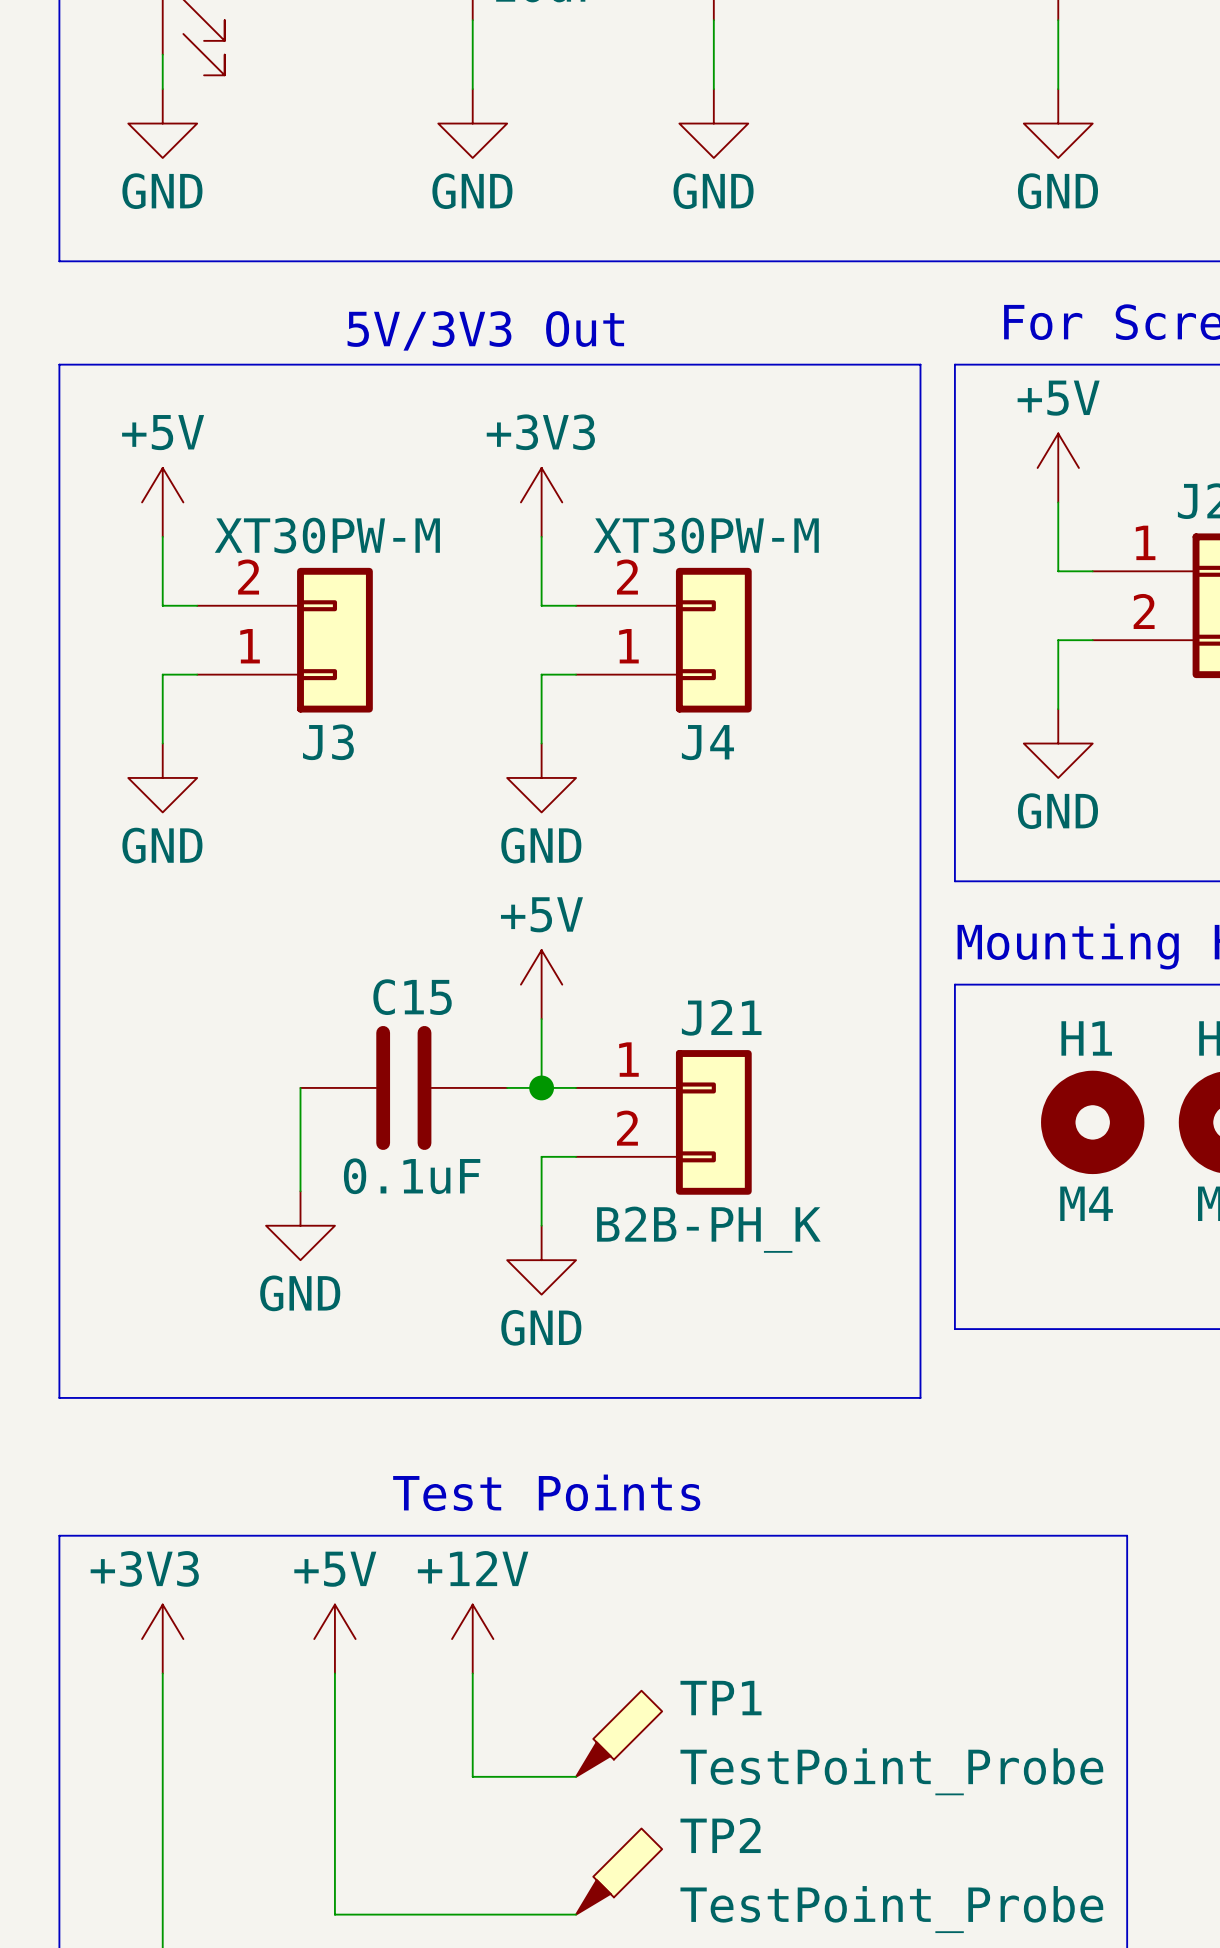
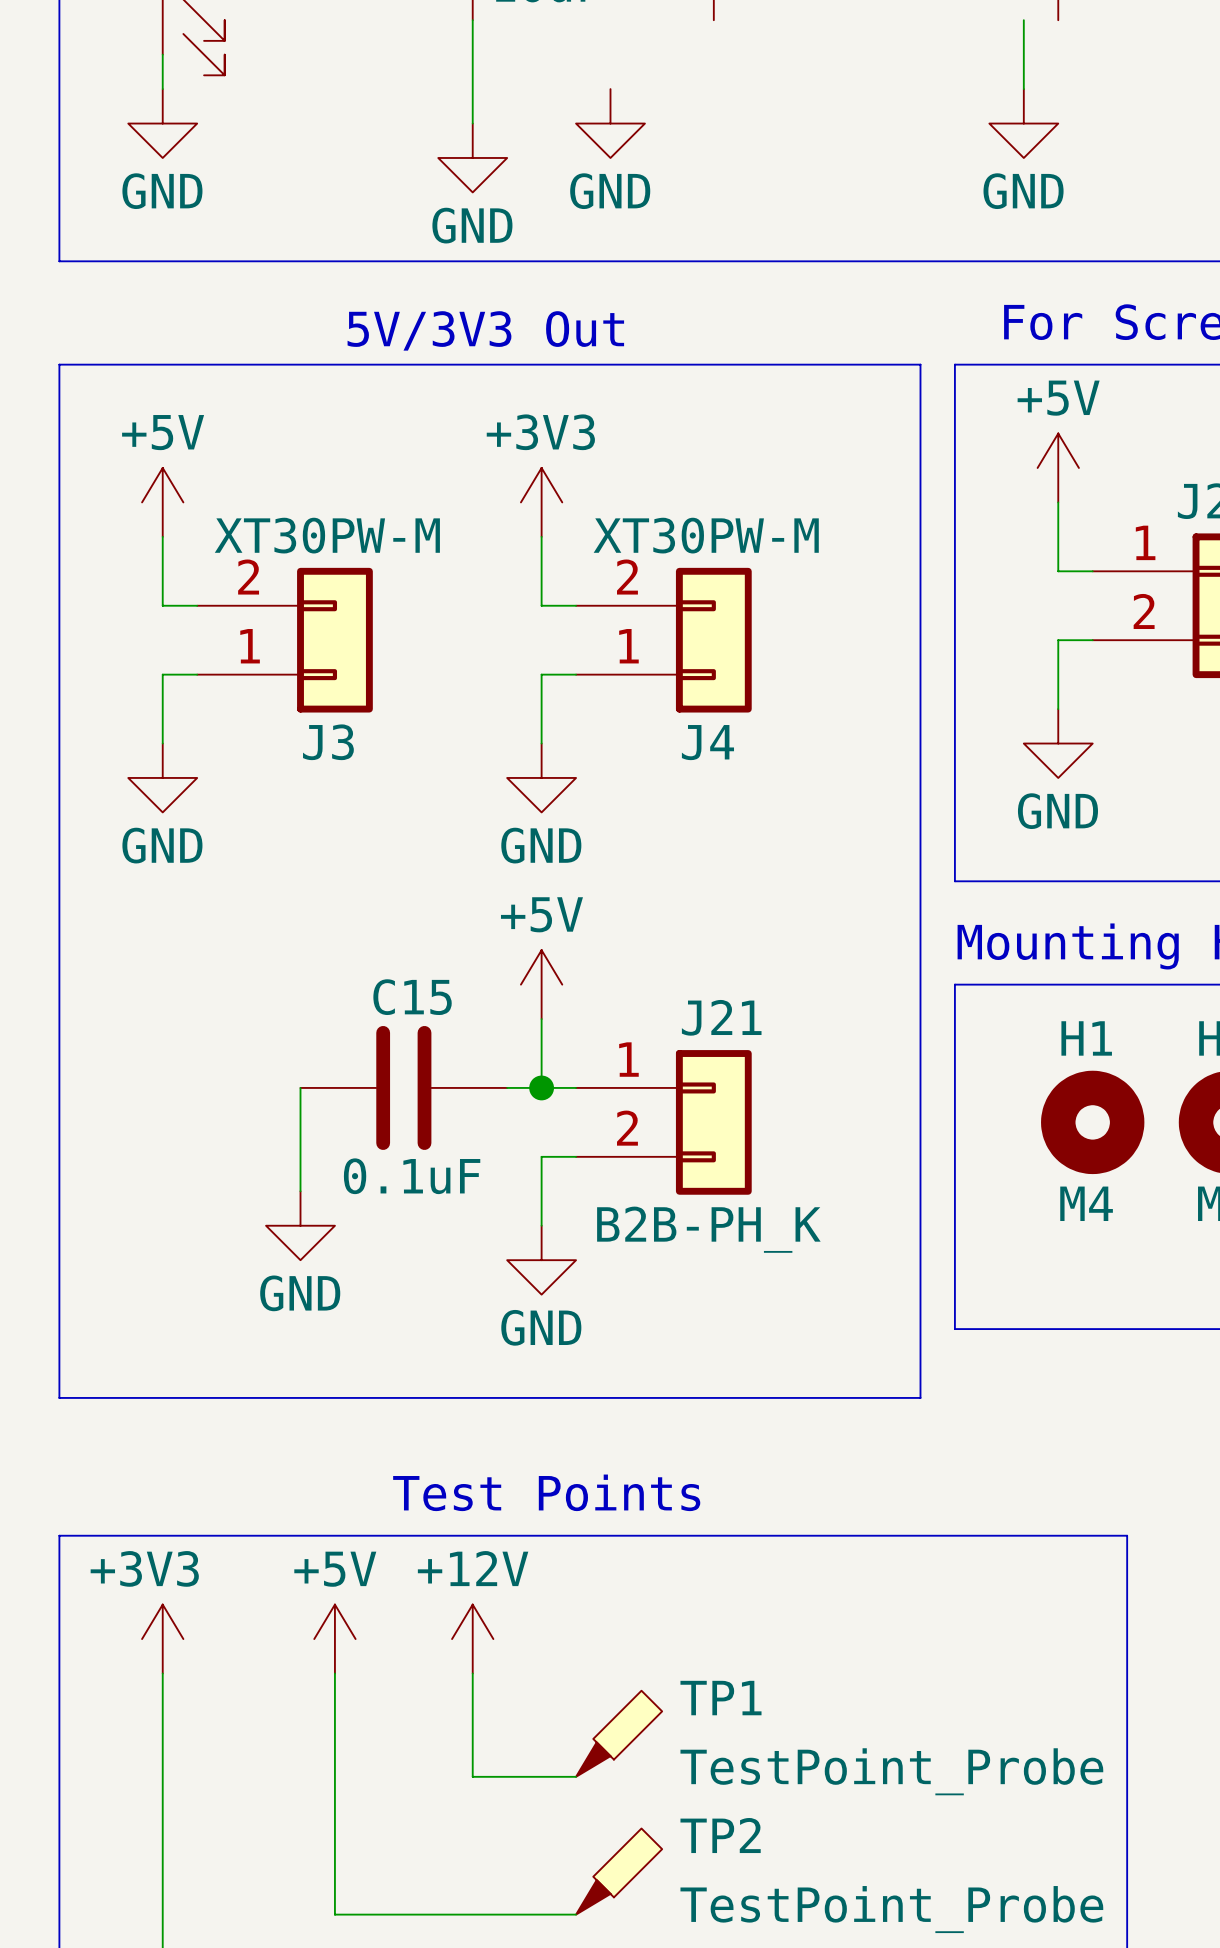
wire: (713, 20) (713, 89) -> none
wire: (1058, 20) (1058, 89) -> (1023, 20) (1023, 89)
power symbol position: GND (472, 123) -> GND (472, 157)
power symbol: none -> GND (610, 123)
power symbol: GND (713, 123) -> none
power symbol position: GND (1058, 123) -> GND (1023, 123)

